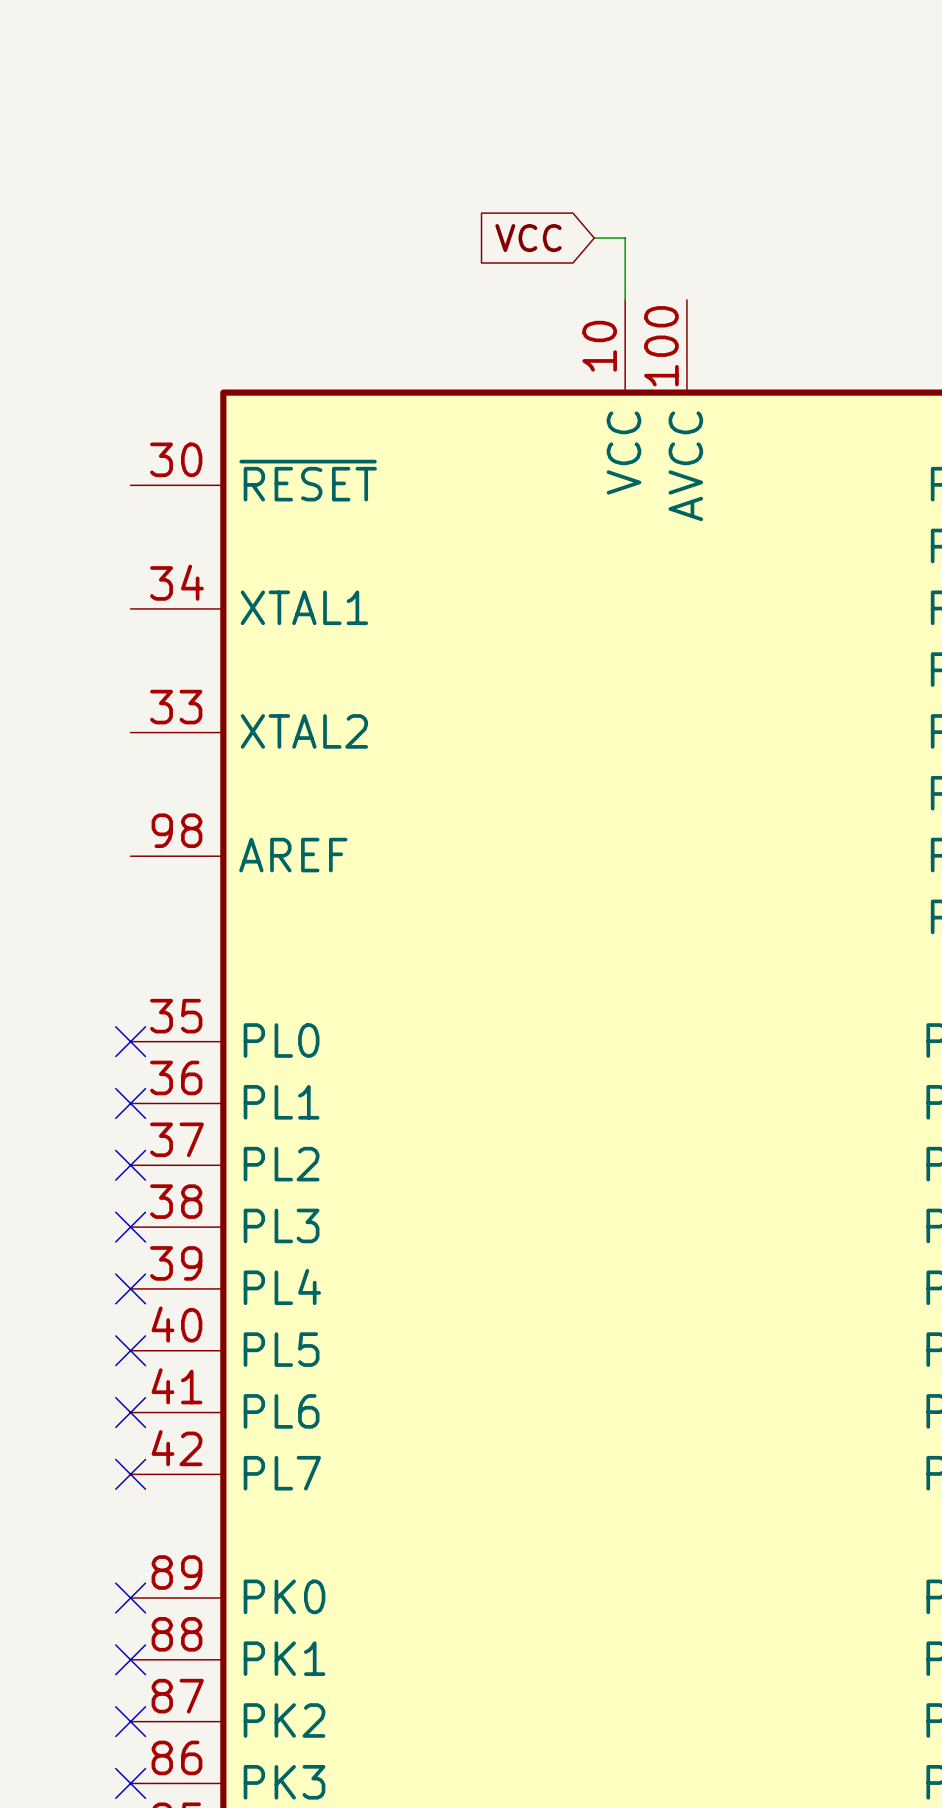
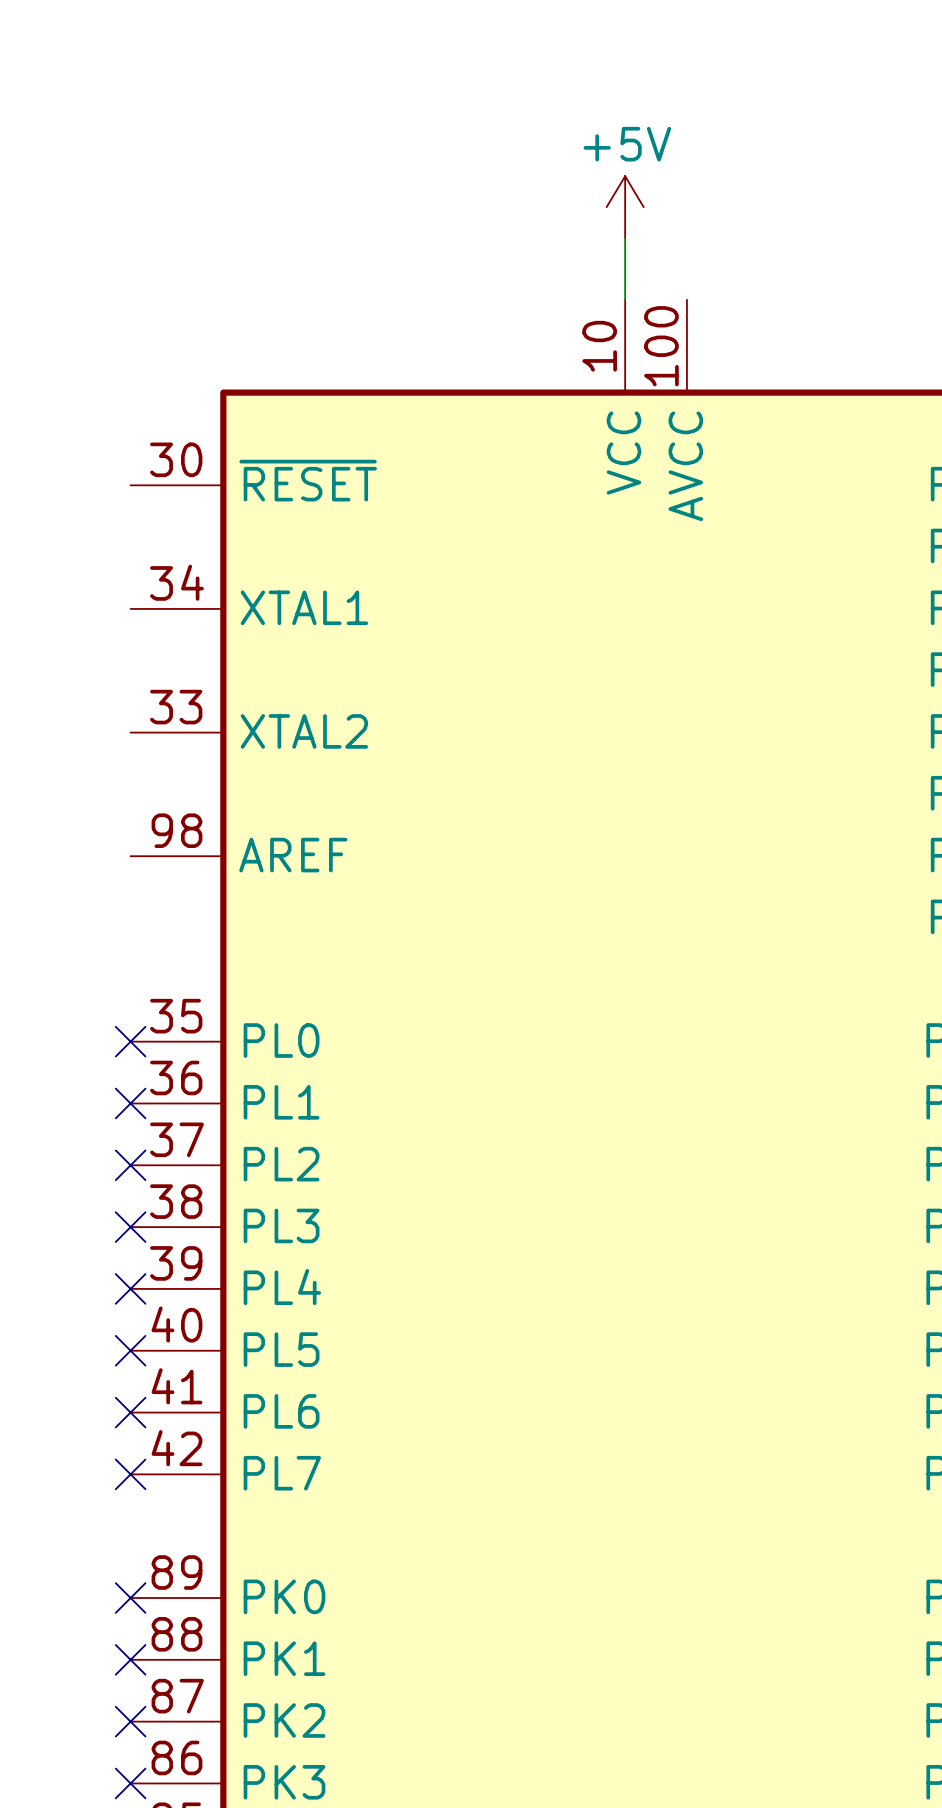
power symbol: none -> +5V (625, 207)
global label: VCC (528, 238) -> none
wire: (594, 238) (625, 238) -> none

